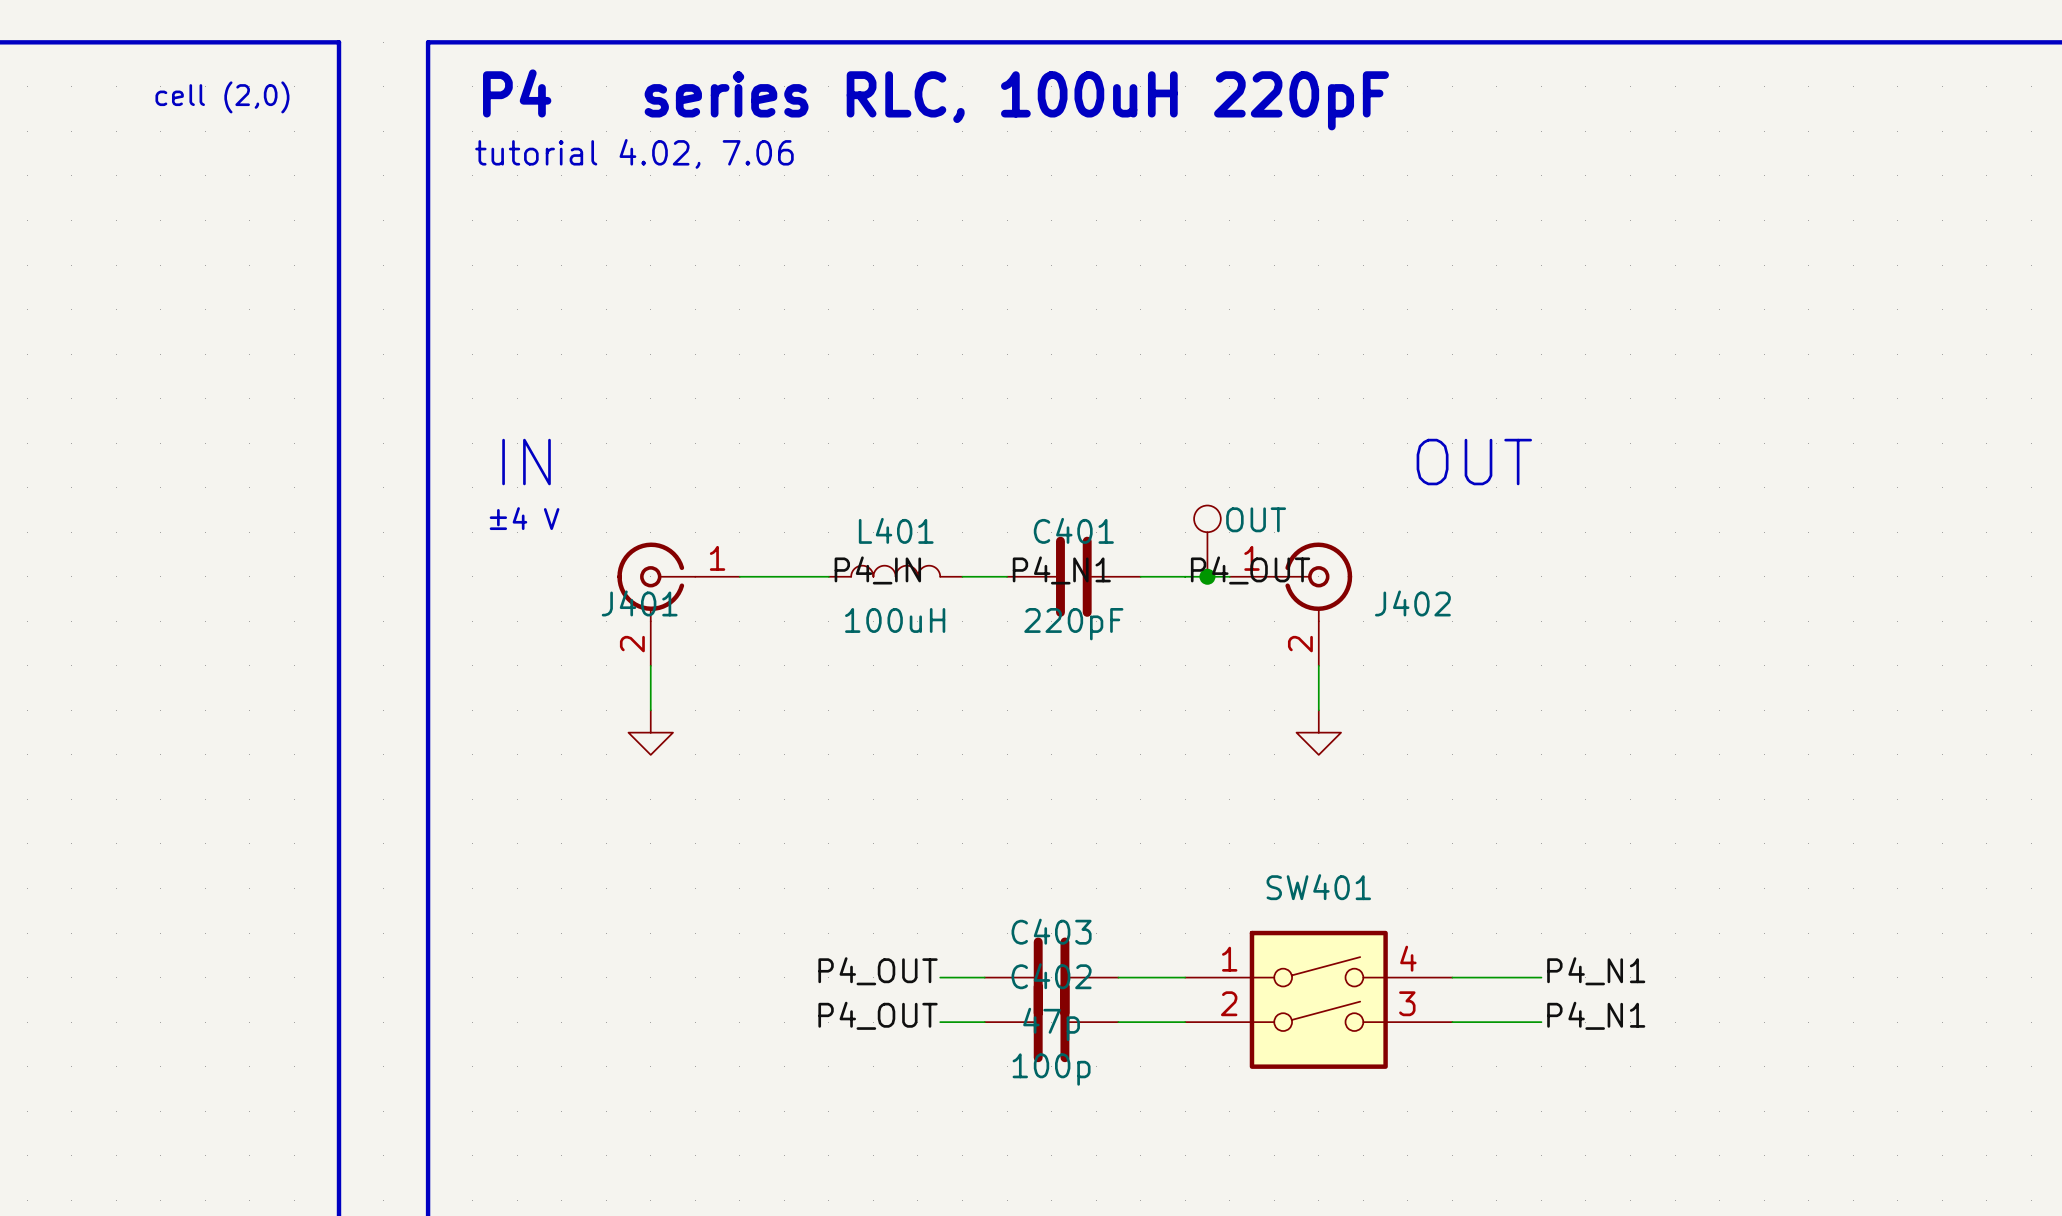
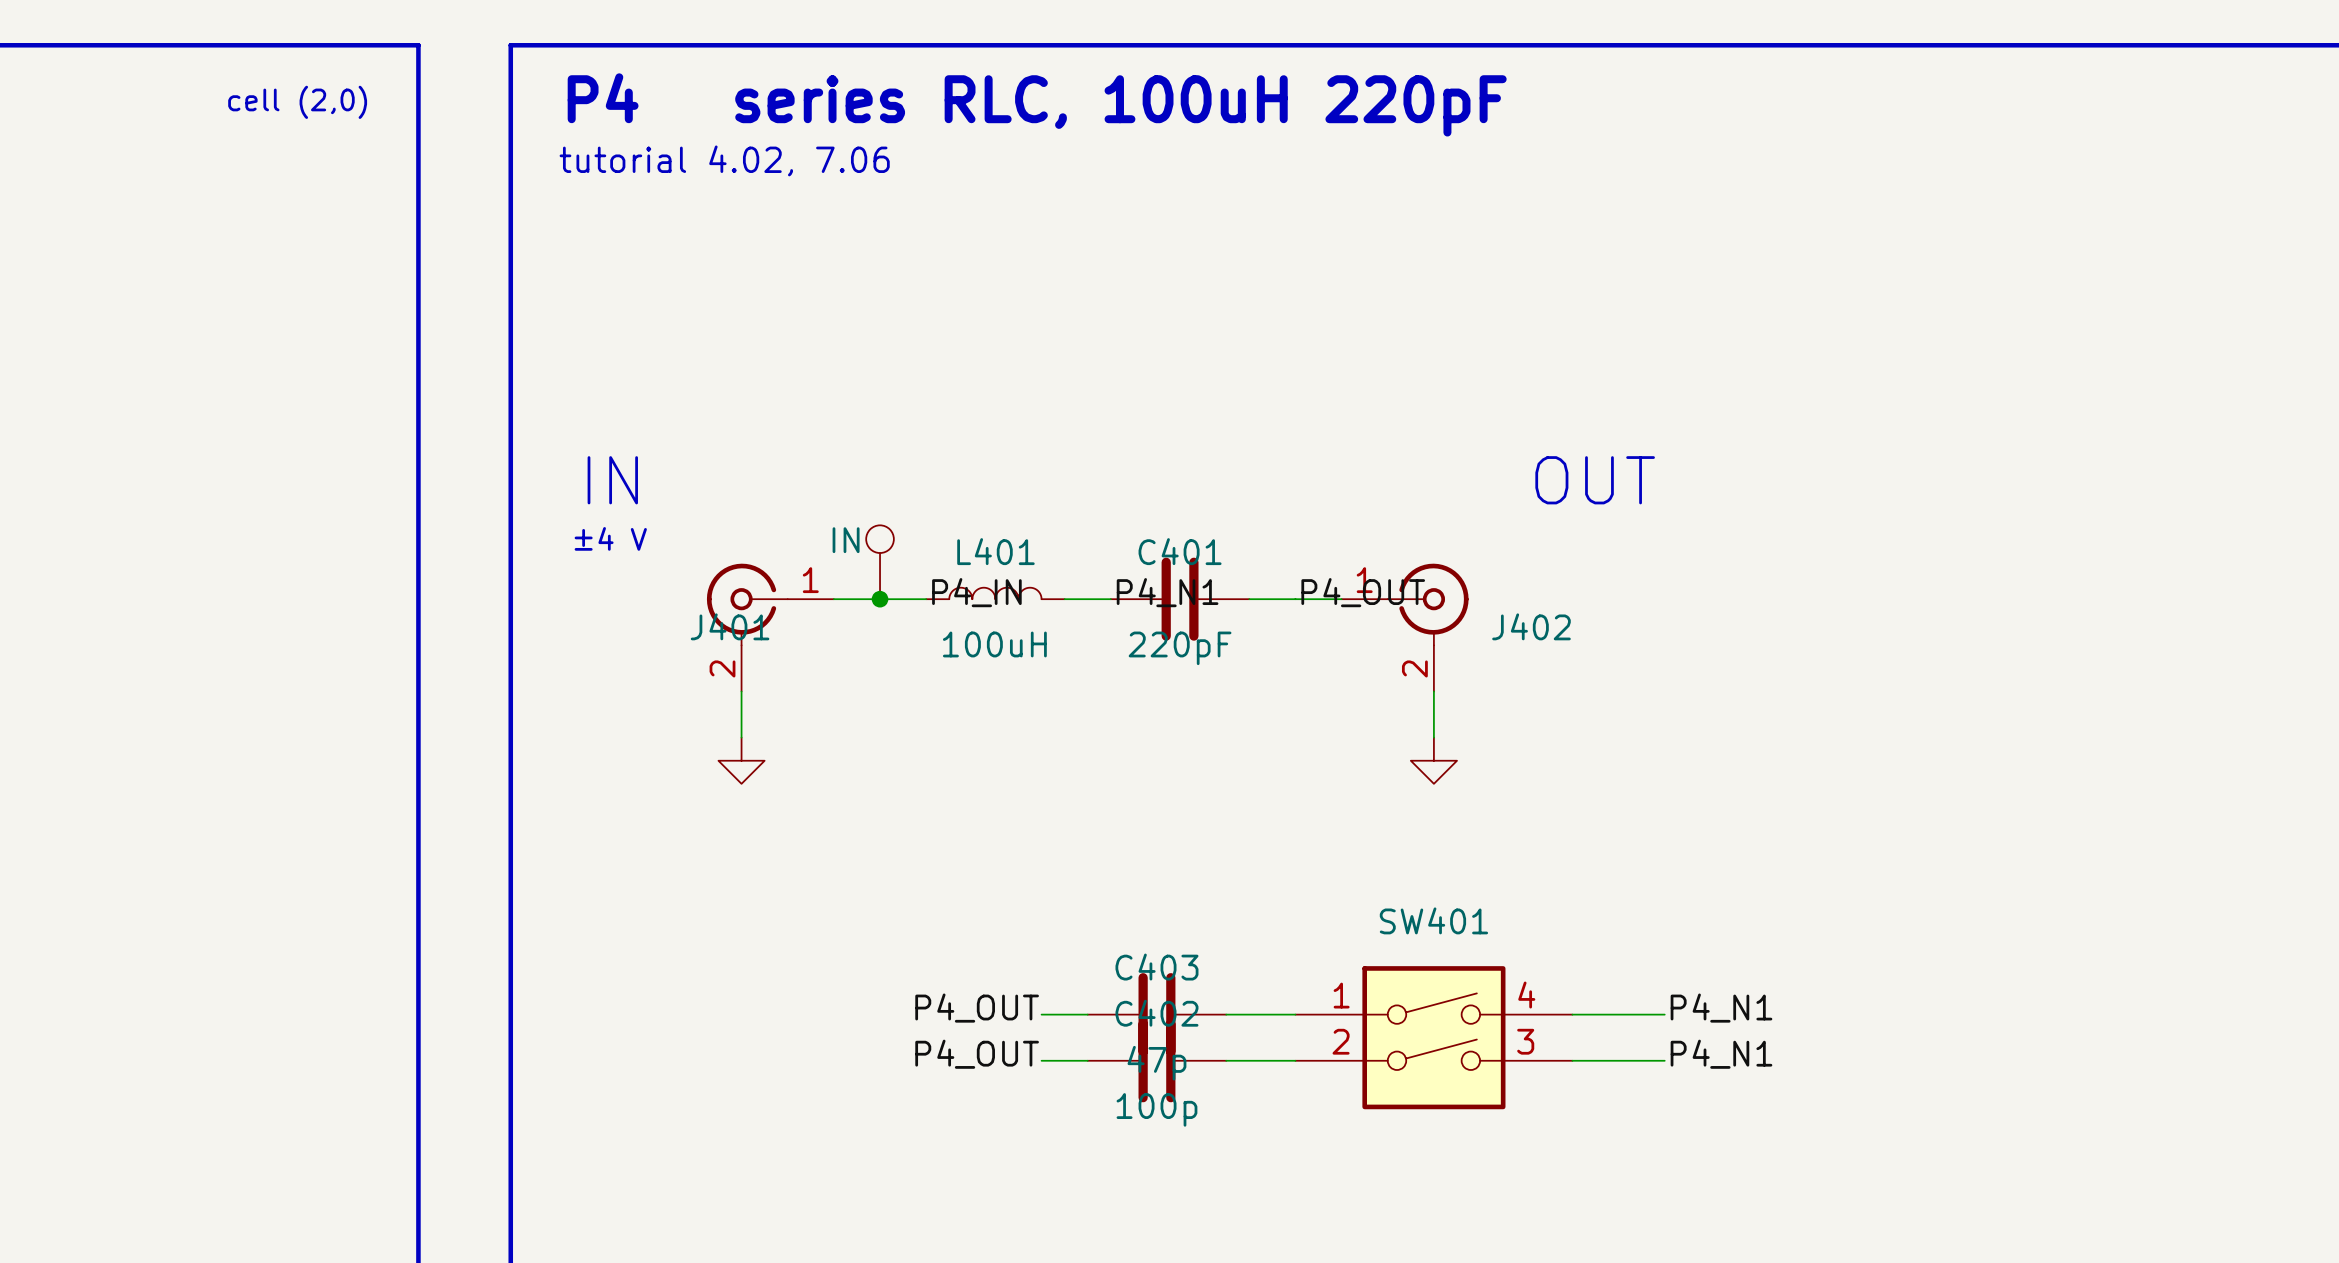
part: none -> IN (880, 562)
part: OUT (1207, 541) -> none
junction: none -> (880, 599)
junction: (1207, 576) -> none

